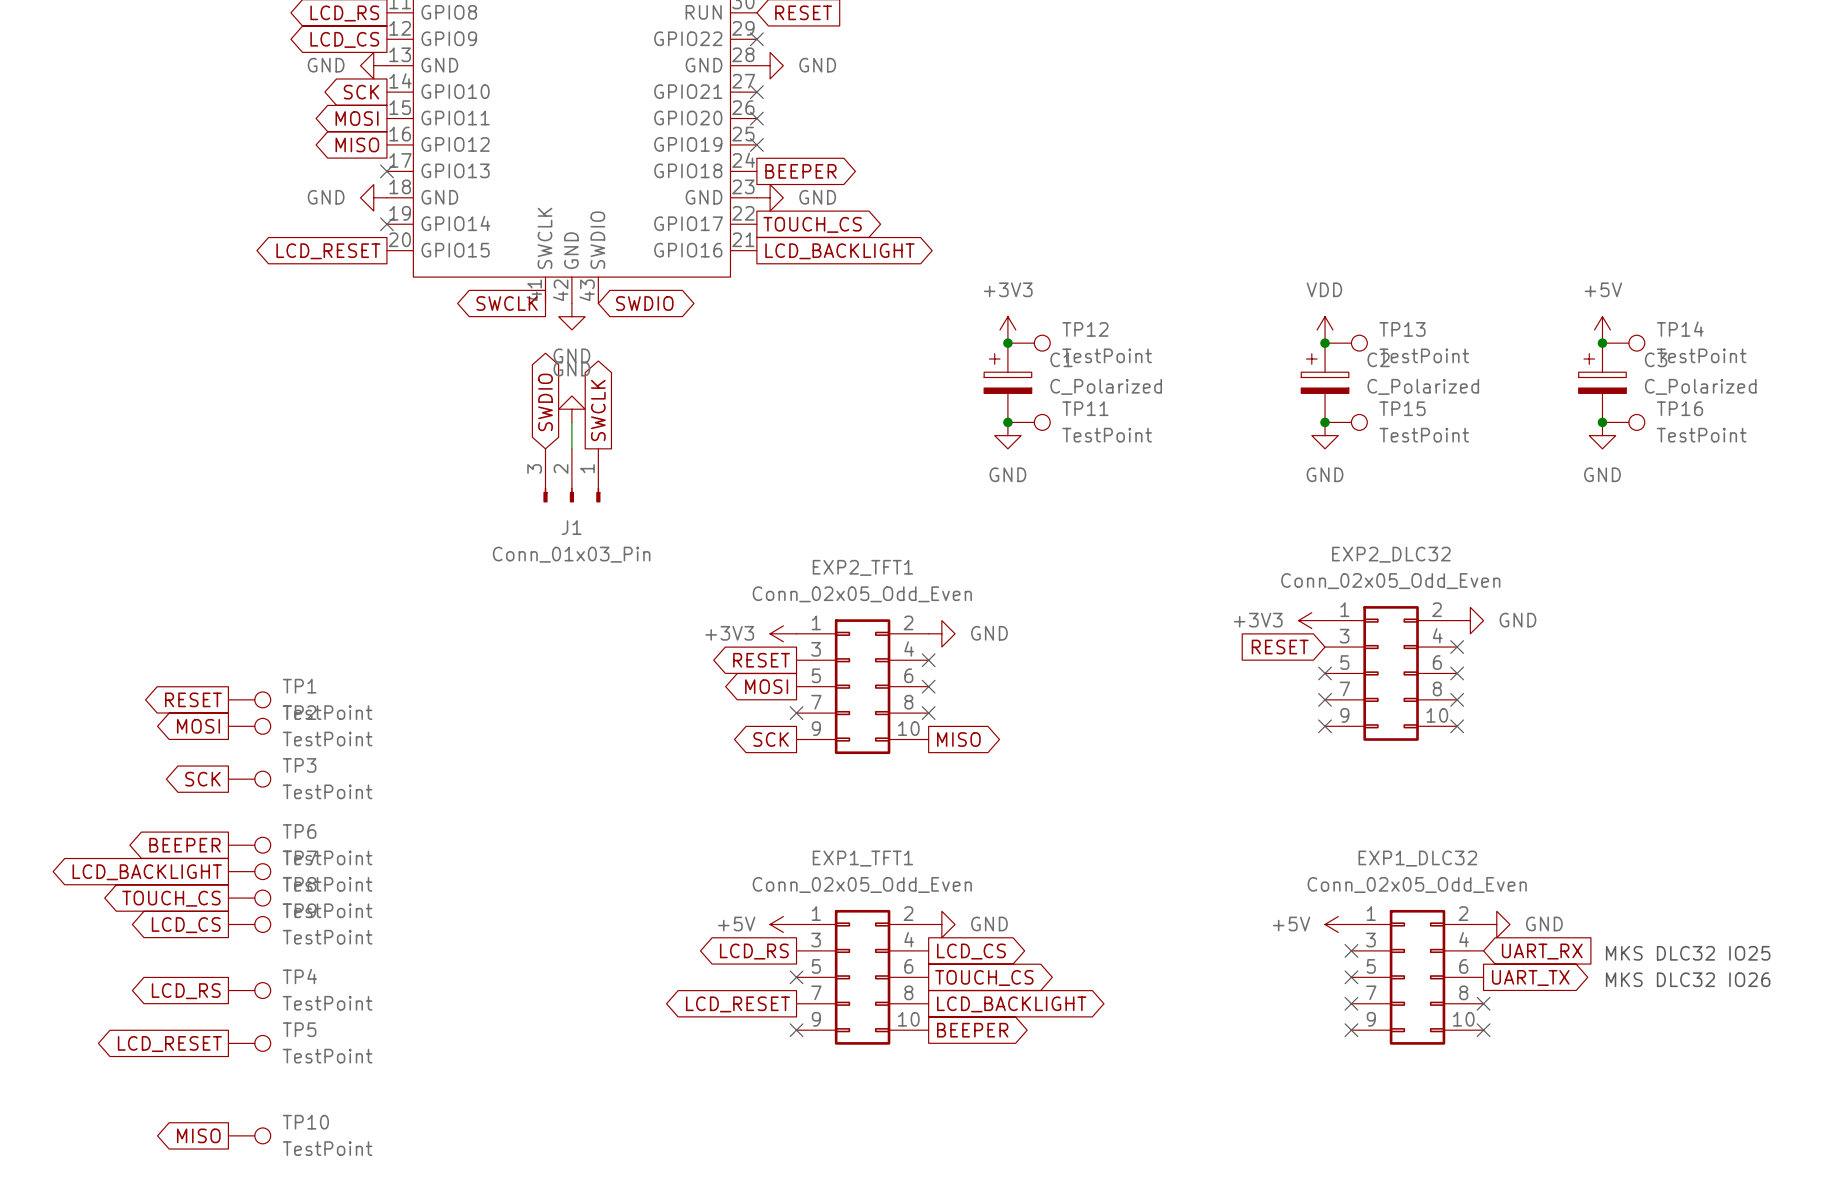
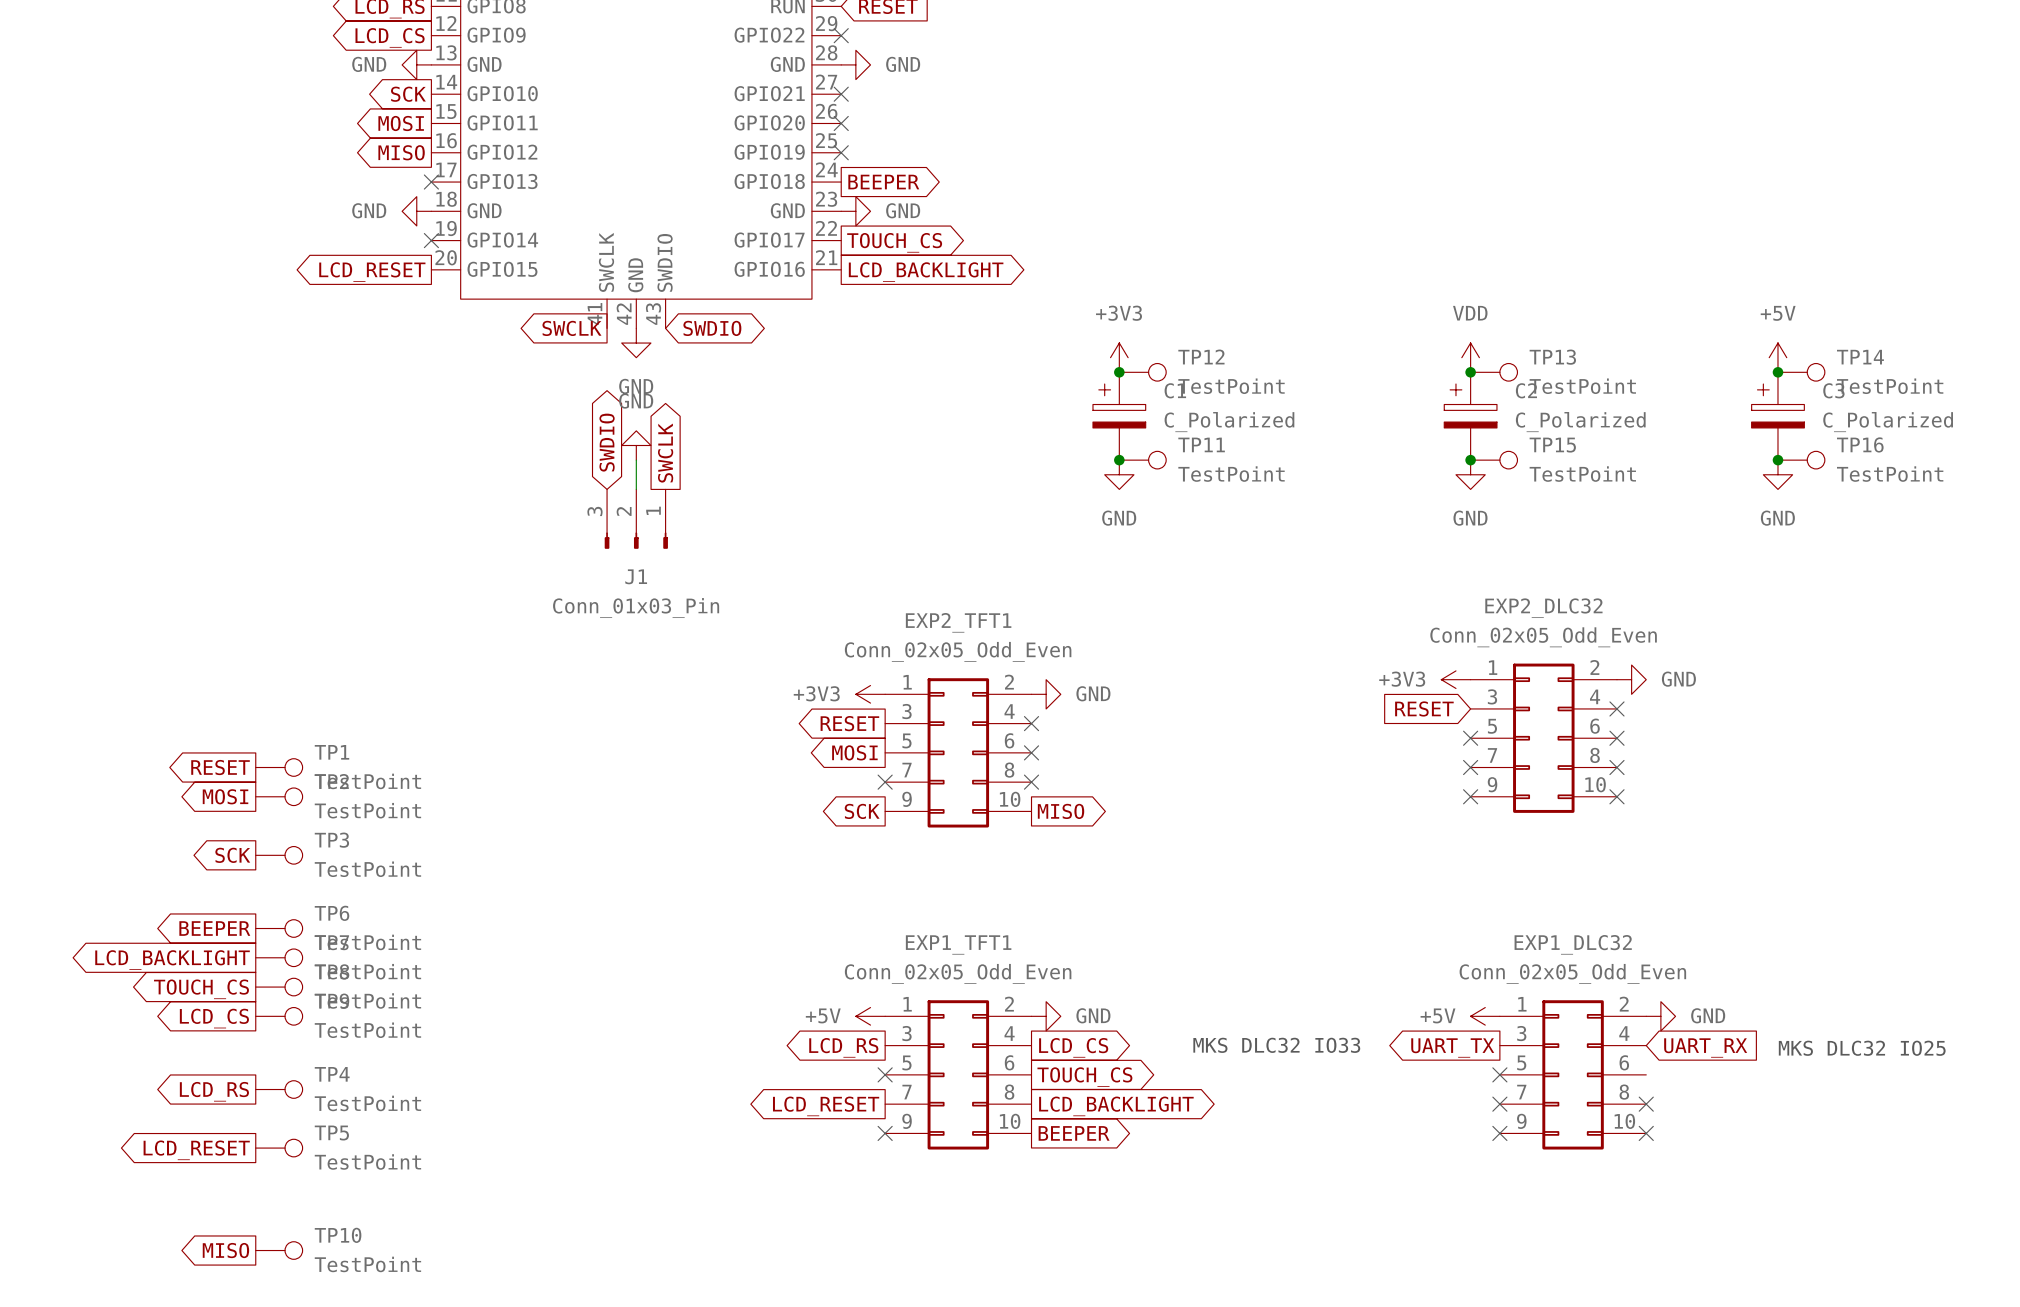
text: none -> MKS DLC32 IO33 (1276, 1045)
no-connect mark: (1351, 950) -> none
global label rotation: 0° (1530, 977) -> 180° (1452, 1047)
global label position: UART_TX (1530, 977) -> UART_TX (1452, 1047)
text: MKS DLC32 IO26 (1688, 979) -> none

